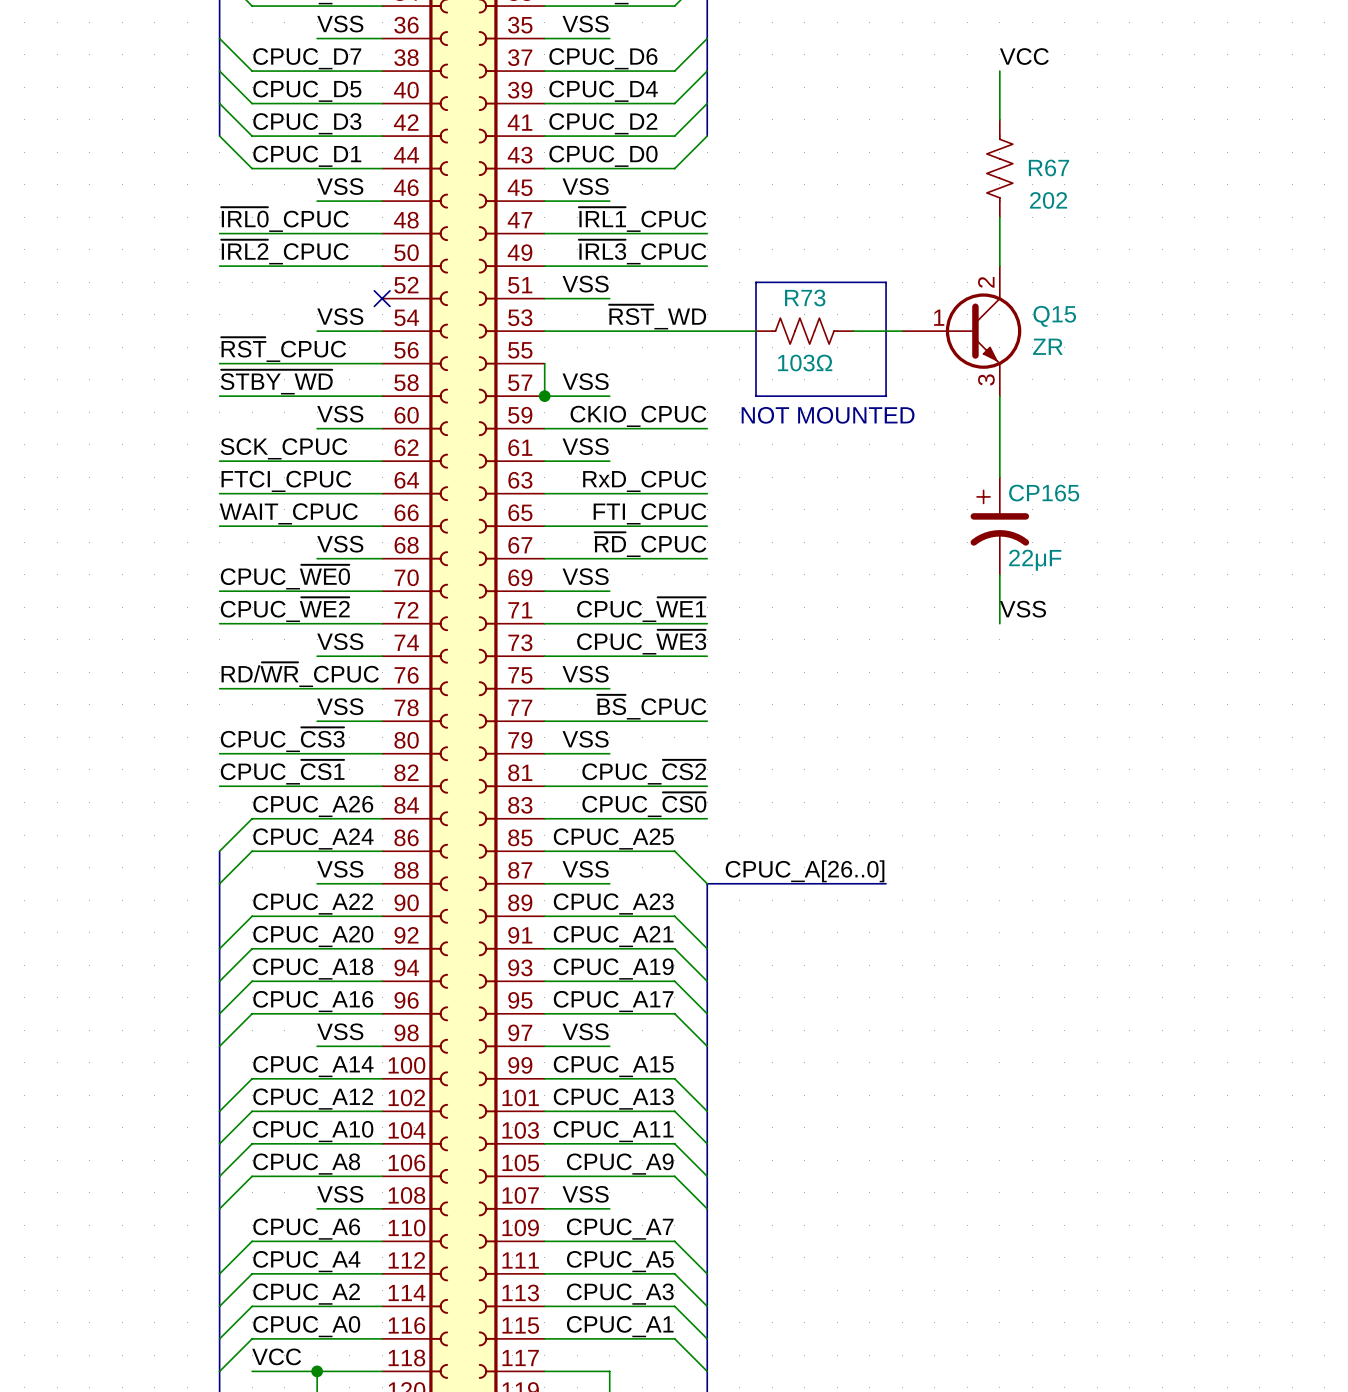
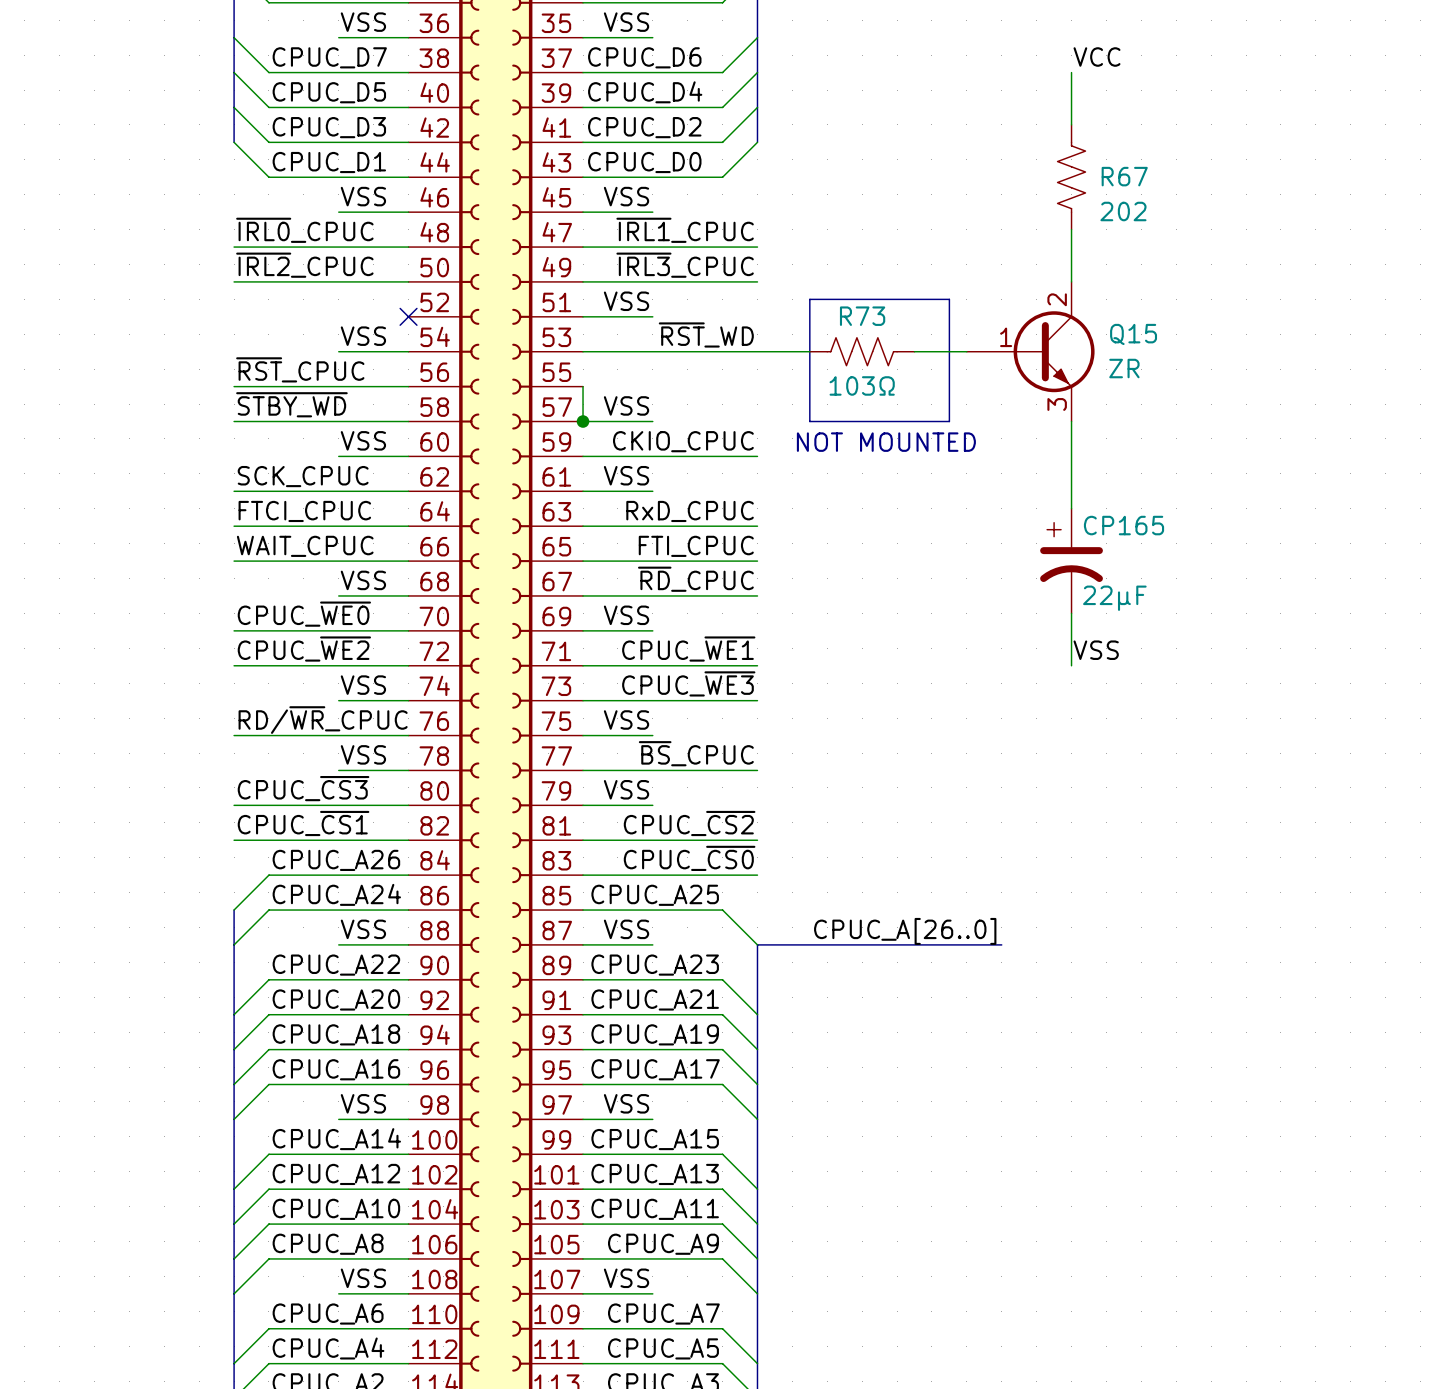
label position: CPUC_A[26..0] (805, 871) -> CPUC_A[26..0] (905, 931)
bus: none -> (949, 944) (1001, 944)

